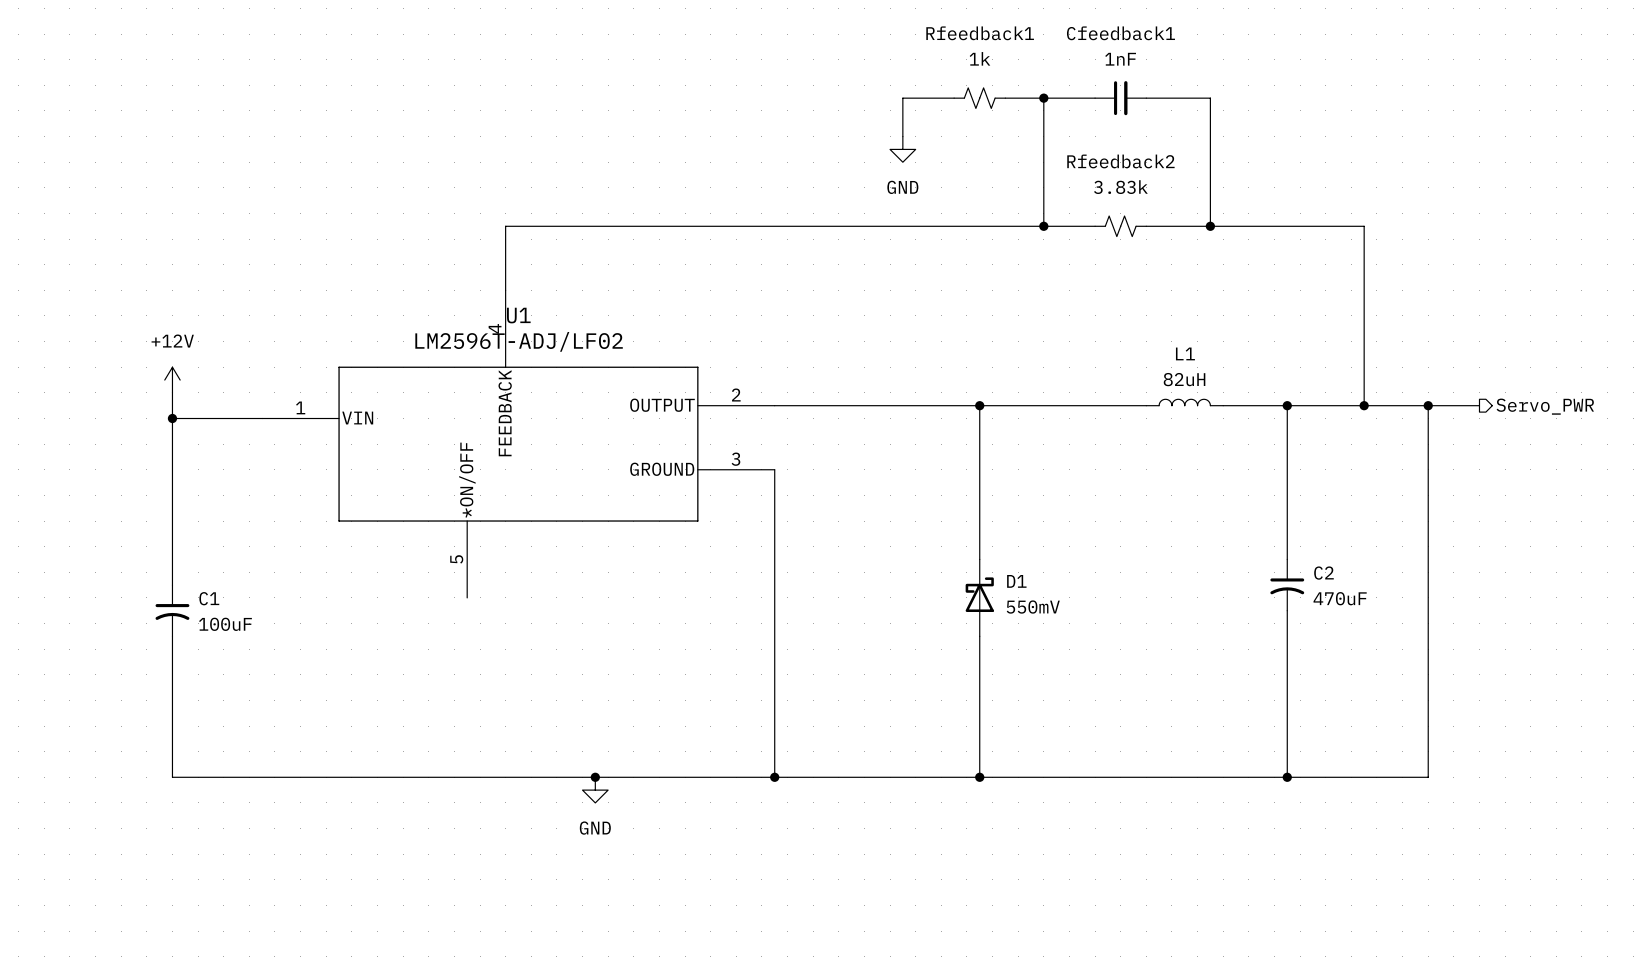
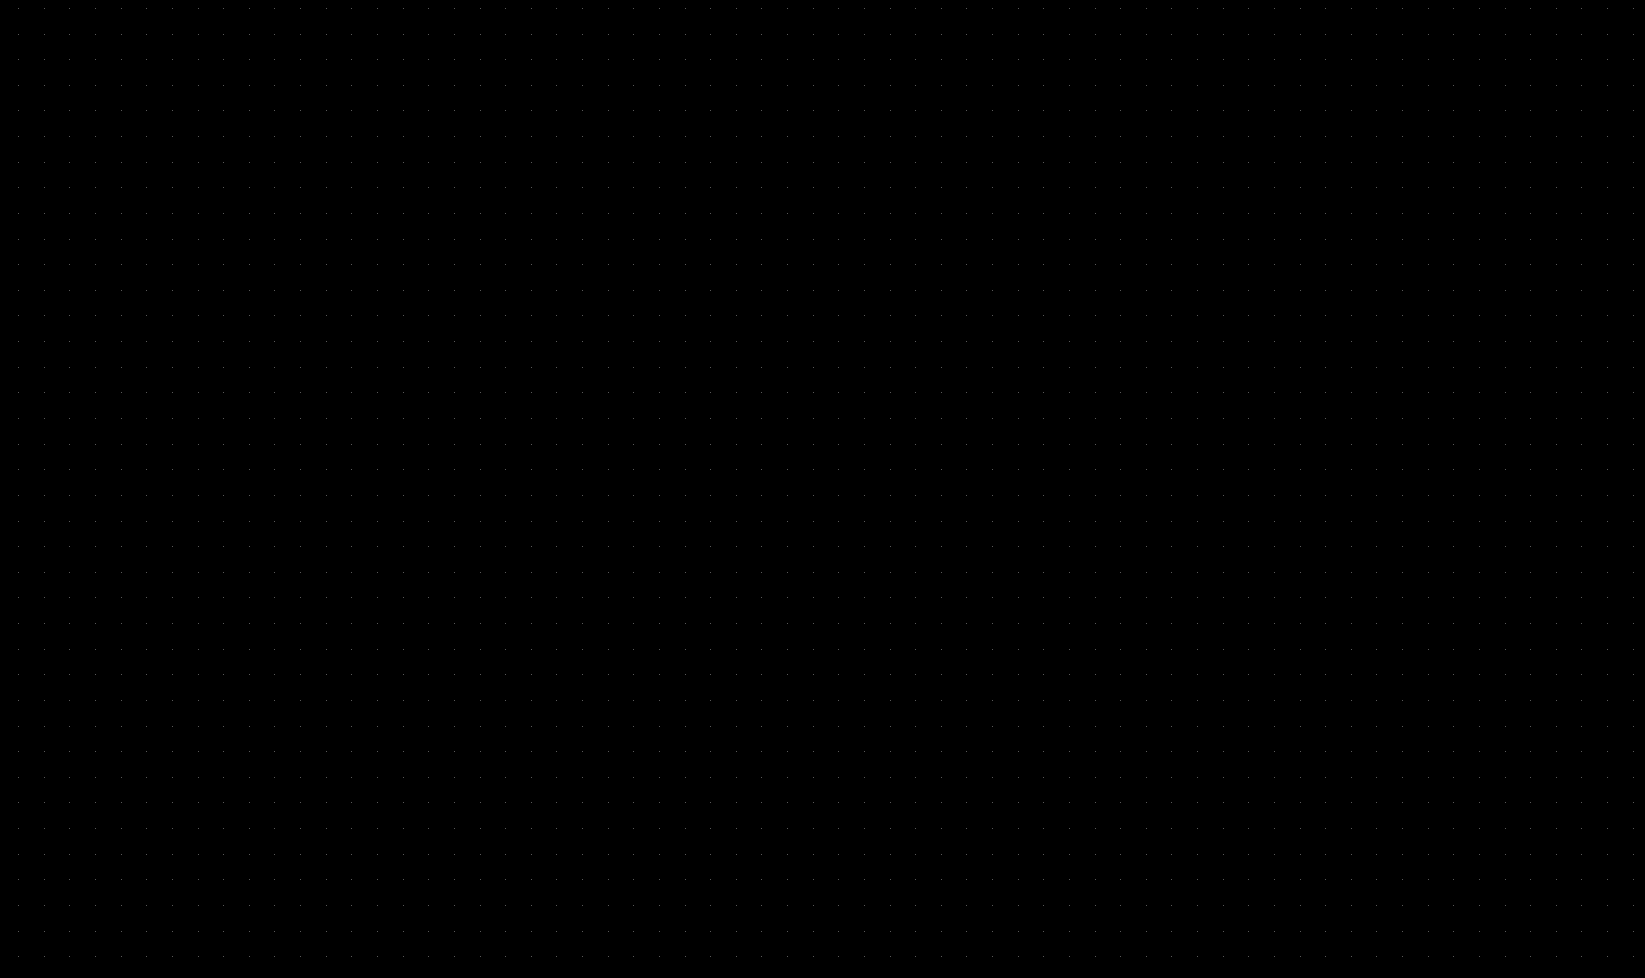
wire: (954, 98) (902, 98) (902, 136) -> none
Rfeedback1: 1k (979, 98) -> none
wire: (1005, 98) (1095, 98) -> none
wire: (1043, 98) (1043, 226) -> none
junction: (1043, 98) -> none
Cfeedback1: 1nF (1120, 98) -> none
wire: (1146, 98) (1210, 98) (1210, 226) -> none
power symbol: GND (902, 149) -> none
junction: (1043, 226) -> none
wire: (1095, 226) (505, 226) (505, 290) -> none
Rfeedback2: 3.83k (1120, 226) -> none
wire: (1146, 226) (1364, 226) (1364, 405) -> none
junction: (1210, 226) -> none
power symbol: +12V (172, 380) -> none
wire: (172, 392) (172, 585) -> none
L1: 82uH (1184, 402) -> none
wire: (774, 405) (1146, 405) -> none
wire: (979, 405) (979, 559) -> none
junction: (979, 405) -> none
wire: (1223, 405) (1479, 405) -> none
wire: (1287, 405) (1287, 559) -> none
junction: (1287, 405) -> none
junction: (1364, 405) -> none
wire: (1428, 405) (1428, 777) (172, 777) (172, 636) -> none
junction: (1428, 405) -> none
hierarchical label: Servo_PWR (1545, 406) -> none
wire: (172, 418) (262, 418) -> none
junction: (172, 418) -> none
U1: LM2596T-ADJ/LF02 (518, 444) -> none
wire: (774, 469) (774, 777) -> none
C2: 470uF (1287, 585) -> none
D1: 550mV (979, 597) -> none
C1: 100uF (172, 610) -> none
wire: (1287, 610) (1287, 777) -> none
wire: (979, 636) (979, 777) -> none
junction: (595, 777) -> none
junction: (774, 777) -> none
junction: (979, 777) -> none
junction: (1287, 777) -> none
power symbol: GND (595, 790) -> none

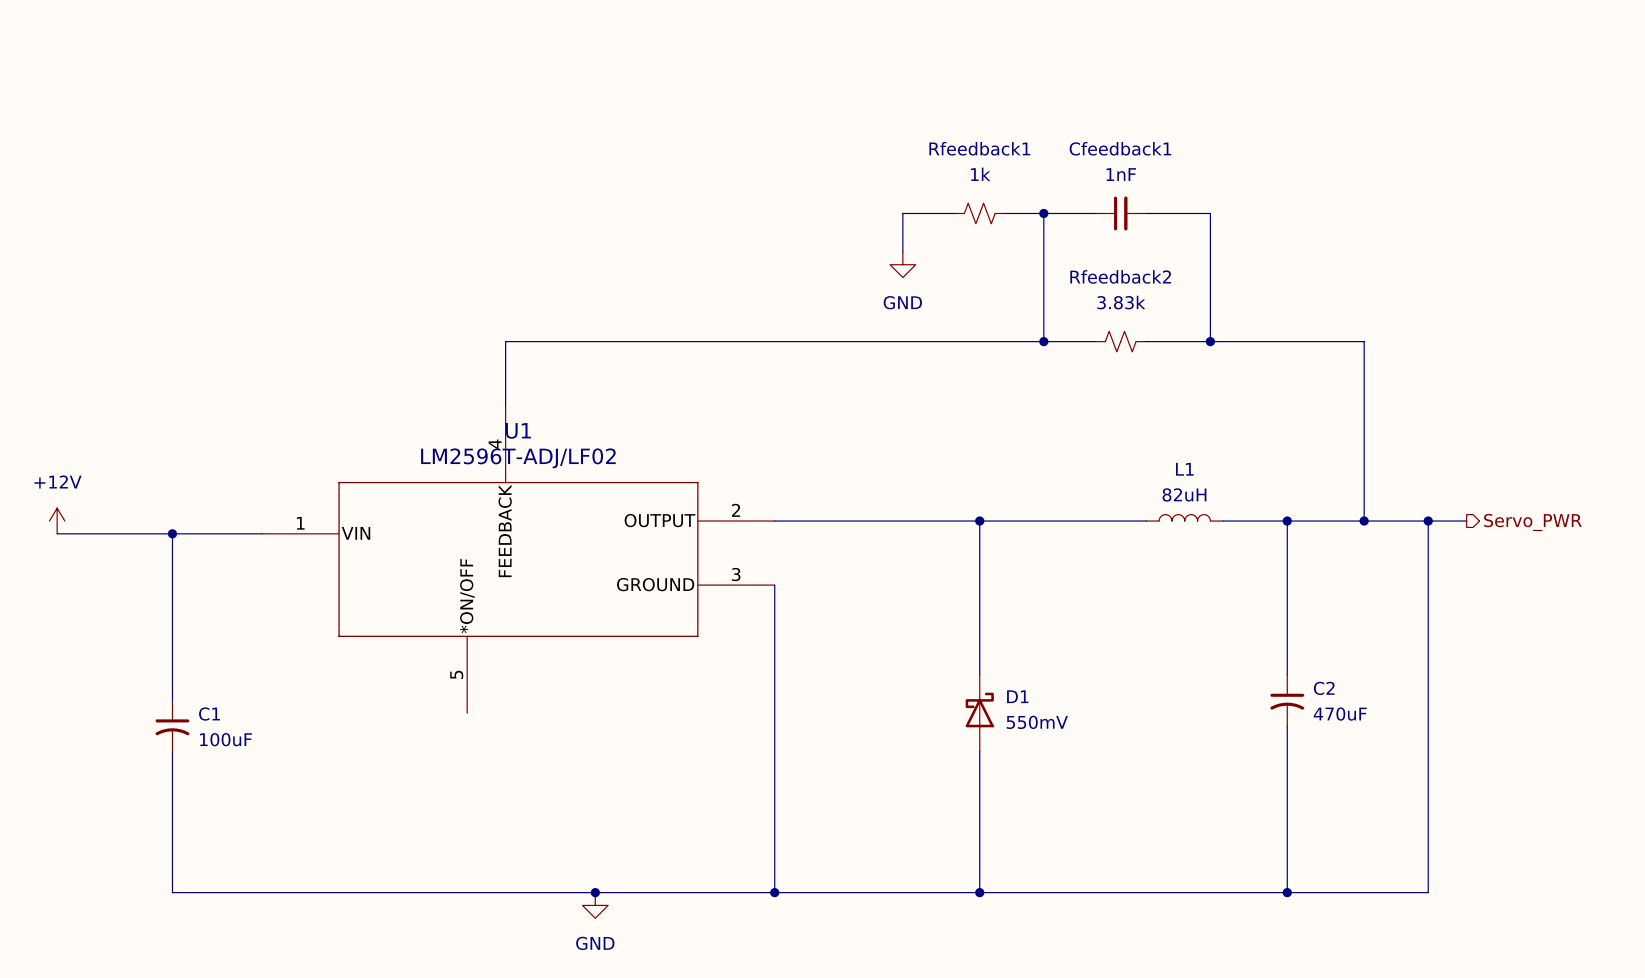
wire: none -> (954, 213) (902, 213) (902, 251)
Rfeedback1: none -> 1k (979, 213)
wire: none -> (1005, 213) (1095, 213)
wire: none -> (1043, 213) (1043, 341)
junction: none -> (1043, 213)
Cfeedback1: none -> 1nF (1120, 213)
wire: none -> (1146, 213) (1210, 213) (1210, 341)
power symbol: none -> GND (902, 264)
junction: none -> (1043, 341)
wire: none -> (1095, 341) (505, 341) (505, 405)
Rfeedback2: none -> 3.83k (1120, 341)
wire: none -> (1146, 341) (1364, 341) (1364, 521)
junction: none -> (1210, 341)
L1: none -> 82uH (1184, 517)
power symbol: none -> +12V (57, 521)
wire: none -> (774, 521) (1146, 521)
wire: none -> (979, 521) (979, 674)
junction: none -> (979, 521)
wire: none -> (1223, 521) (1466, 521)
wire: none -> (1287, 521) (1287, 674)
junction: none -> (1287, 521)
junction: none -> (1364, 521)
wire: none -> (1428, 521) (1428, 892) (172, 892) (172, 751)
junction: none -> (1428, 521)
hierarchical label: none -> Servo_PWR (1532, 522)
wire: none -> (57, 533) (262, 533)
wire: none -> (172, 533) (172, 700)
junction: none -> (172, 533)
U1: none -> LM2596T-ADJ/LF02 (518, 559)
wire: none -> (774, 585) (774, 892)
C2: none -> 470uF (1287, 700)
D1: none -> 550mV (979, 713)
C1: none -> 100uF (172, 726)
wire: none -> (1287, 726) (1287, 892)
wire: none -> (979, 751) (979, 892)
junction: none -> (595, 892)
junction: none -> (774, 892)
junction: none -> (979, 892)
junction: none -> (1287, 892)
power symbol: none -> GND (595, 905)

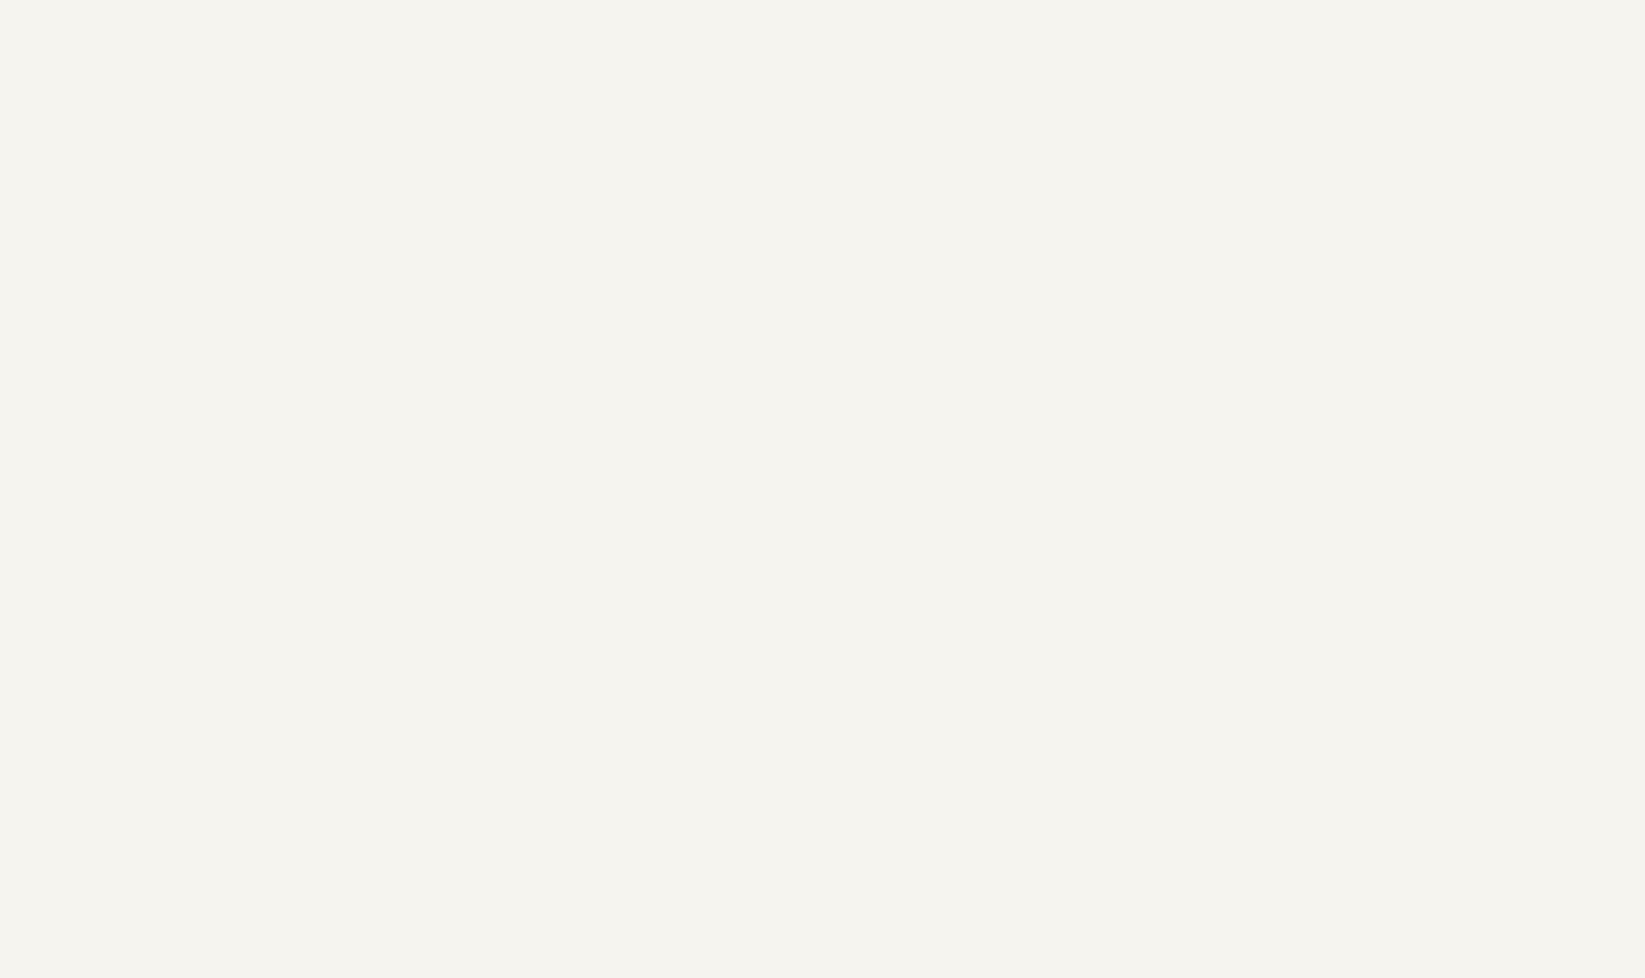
wire: (954, 213) (902, 213) (902, 251) -> none
Rfeedback1: 1k (979, 213) -> none
wire: (1005, 213) (1095, 213) -> none
wire: (1043, 213) (1043, 341) -> none
junction: (1043, 213) -> none
Cfeedback1: 1nF (1120, 213) -> none
wire: (1146, 213) (1210, 213) (1210, 341) -> none
power symbol: GND (902, 264) -> none
junction: (1043, 341) -> none
wire: (1095, 341) (505, 341) (505, 405) -> none
Rfeedback2: 3.83k (1120, 341) -> none
wire: (1146, 341) (1364, 341) (1364, 521) -> none
junction: (1210, 341) -> none
L1: 82uH (1184, 517) -> none
power symbol: +12V (57, 521) -> none
wire: (774, 521) (1146, 521) -> none
wire: (979, 521) (979, 674) -> none
junction: (979, 521) -> none
wire: (1223, 521) (1466, 521) -> none
wire: (1287, 521) (1287, 674) -> none
junction: (1287, 521) -> none
junction: (1364, 521) -> none
wire: (1428, 521) (1428, 892) (172, 892) (172, 751) -> none
junction: (1428, 521) -> none
hierarchical label: Servo_PWR (1532, 522) -> none
wire: (57, 533) (262, 533) -> none
wire: (172, 533) (172, 700) -> none
junction: (172, 533) -> none
U1: LM2596T-ADJ/LF02 (518, 559) -> none
wire: (774, 585) (774, 892) -> none
C2: 470uF (1287, 700) -> none
D1: 550mV (979, 713) -> none
C1: 100uF (172, 726) -> none
wire: (1287, 726) (1287, 892) -> none
wire: (979, 751) (979, 892) -> none
junction: (595, 892) -> none
junction: (774, 892) -> none
junction: (979, 892) -> none
junction: (1287, 892) -> none
power symbol: GND (595, 905) -> none

